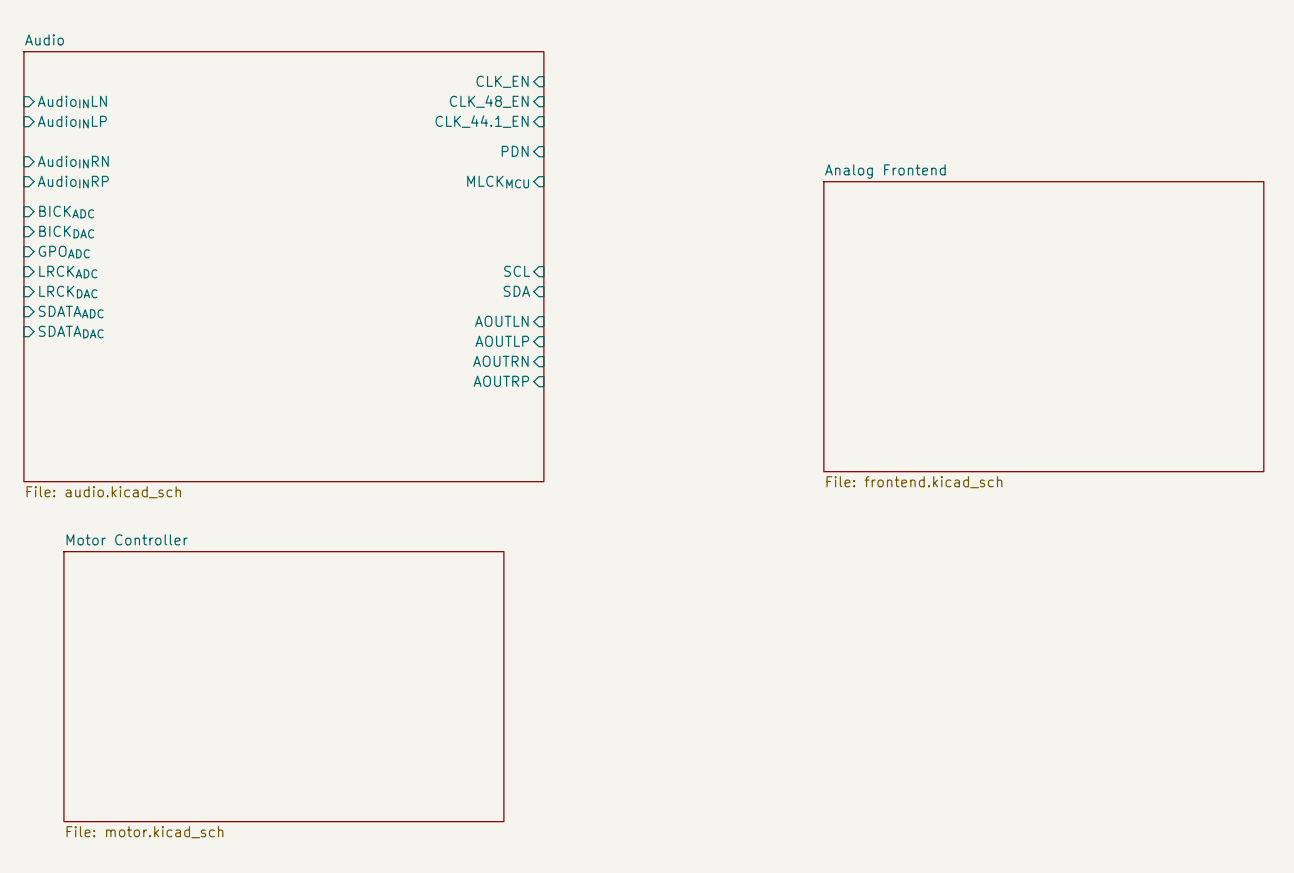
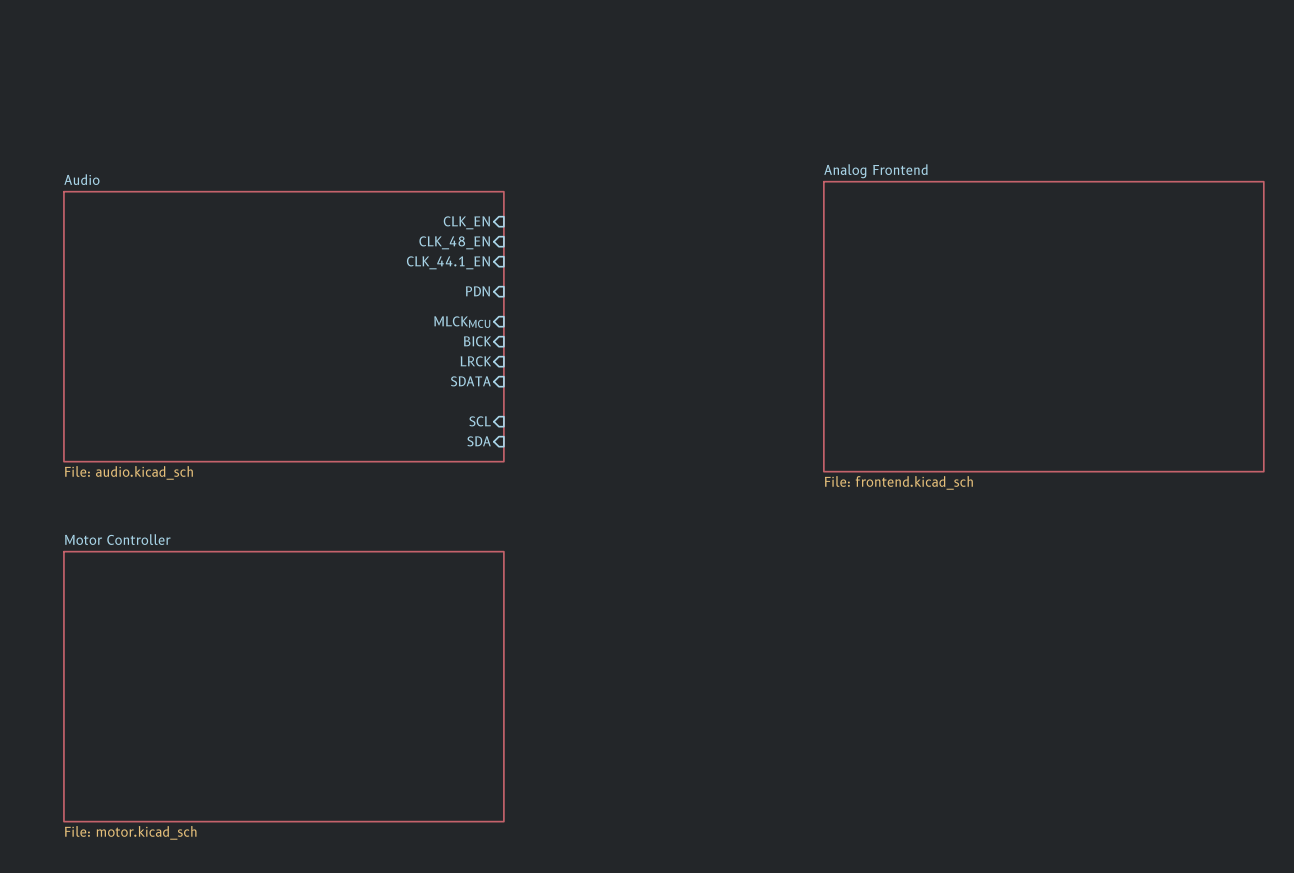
sheet pin position: CLK_EN (502, 81) -> CLK_EN (466, 222)
sheet pin position: CLK_48_EN (489, 101) -> CLK_48_EN (454, 242)
sheet pin: AudioINLN (72, 102) -> none
sheet pin position: CLK_44.1_EN (482, 121) -> CLK_44.1_EN (448, 262)
sheet pin: AudioINLP (72, 122) -> none
sheet pin position: PDN (515, 151) -> PDN (477, 291)
sheet pin: AudioINRN (73, 162) -> none
sheet pin: AudioINRP (73, 182) -> none
sheet pin position: MLCKMCU (498, 182) -> MLCKMCU (462, 322)
sheet pin: BICKADC (66, 212) -> none
sheet pin: BICKDAC (66, 232) -> none
sheet pin: GPOADC (64, 252) -> none
sheet Audio: File: audio.kicad_sch (283, 266) -> none
sheet pin position: SCL (517, 271) -> SCL (480, 421)
sheet pin: LRCKADC (68, 272) -> none
sheet pin position: SDA (516, 291) -> SDA (479, 441)
sheet pin: LRCKDAC (68, 292) -> none
sheet pin: SDATAADC (71, 312) -> none
sheet pin: AOUTLN (501, 321) -> none
sheet Audio: none -> File: audio.kicad_sch (283, 326)
sheet pin: SDATADAC (71, 332) -> none
sheet pin: none -> BICK (477, 341)
sheet pin: AOUTLP (502, 341) -> none
sheet pin: none -> LRCK (475, 361)
sheet pin: AOUTRN (500, 361) -> none
sheet pin: none -> SDATA (470, 381)
sheet pin: AOUTRP (501, 381) -> none

